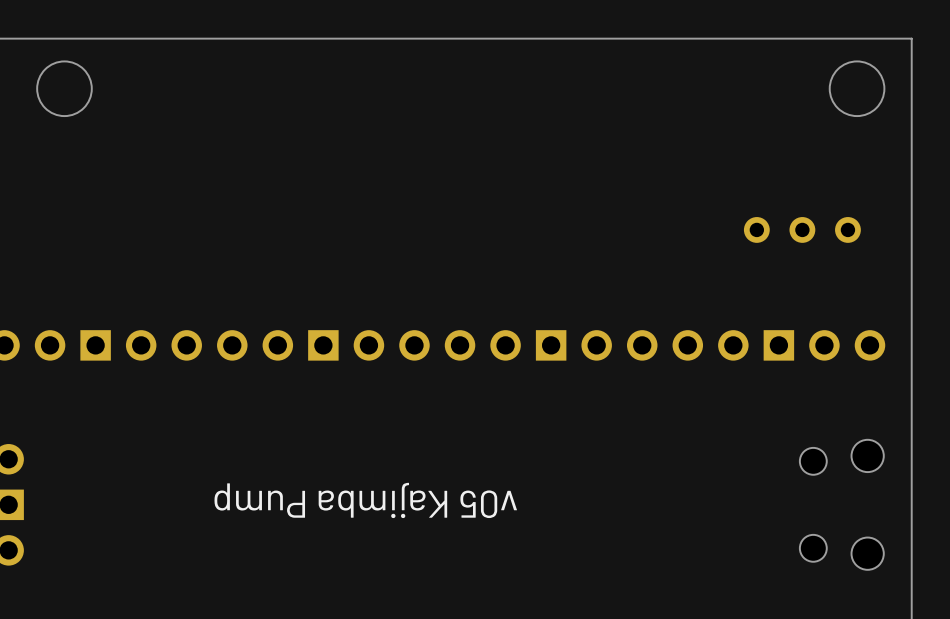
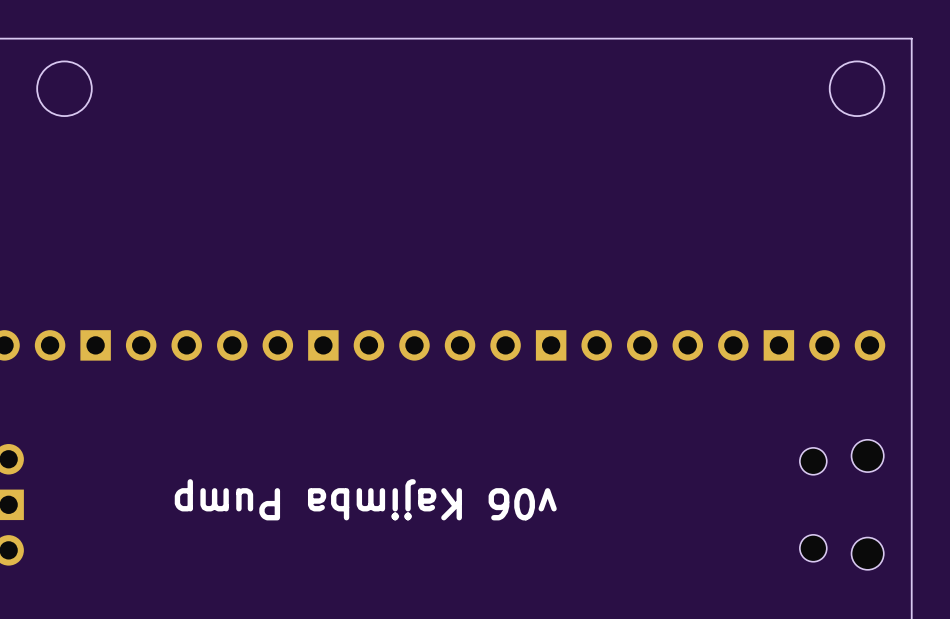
part: (802, 229) -> none
text: v05 Kajimba Pump (365, 500) -> v06 Kajimba Pump (365, 499)

